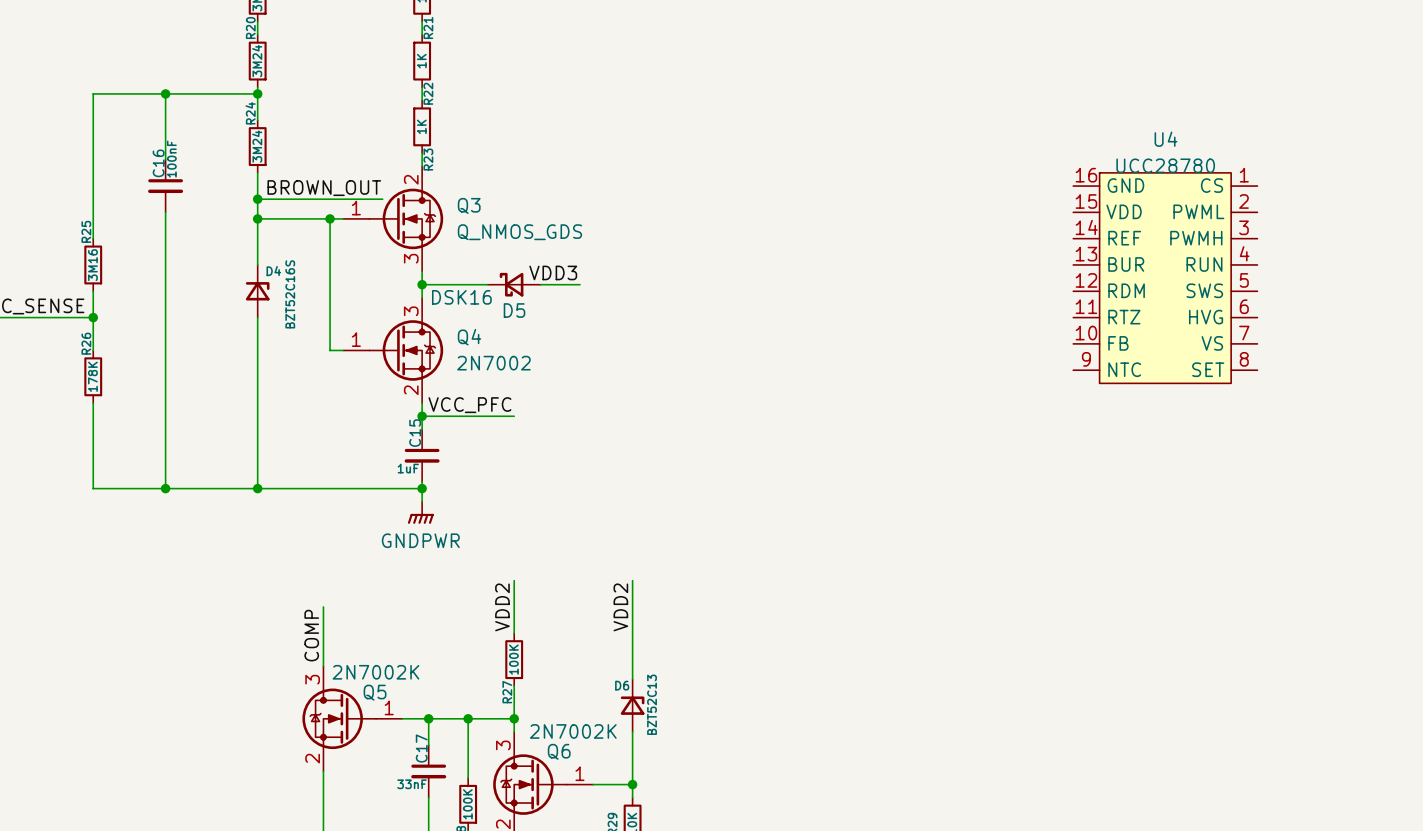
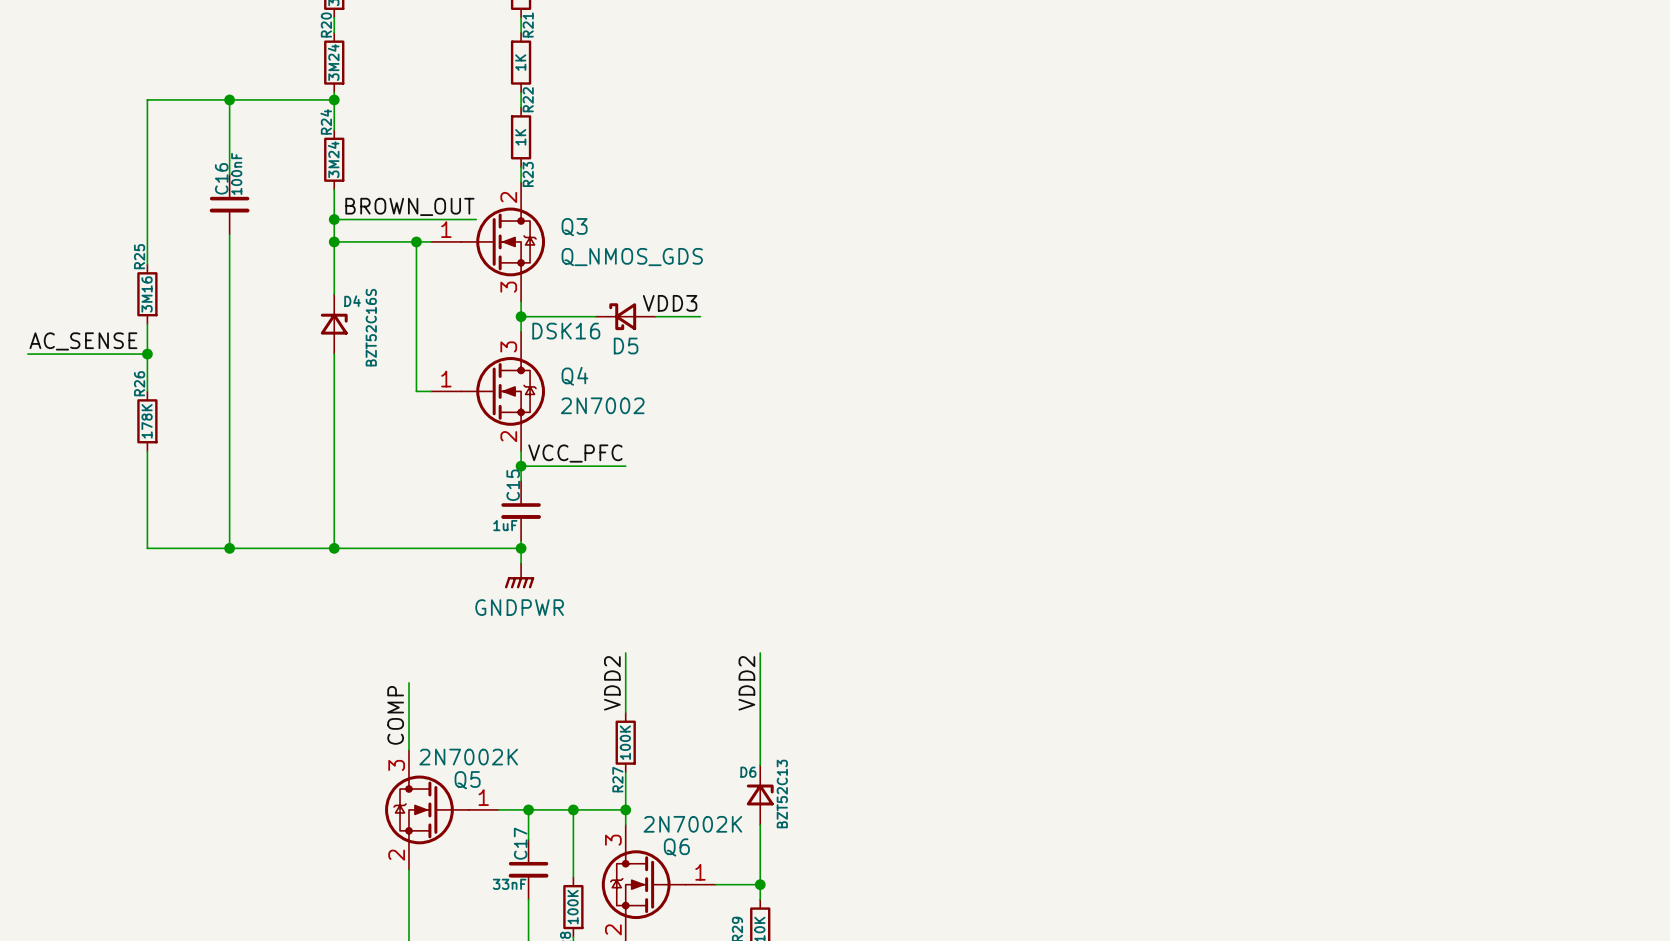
U4: UCC28780 (1165, 278) -> none

